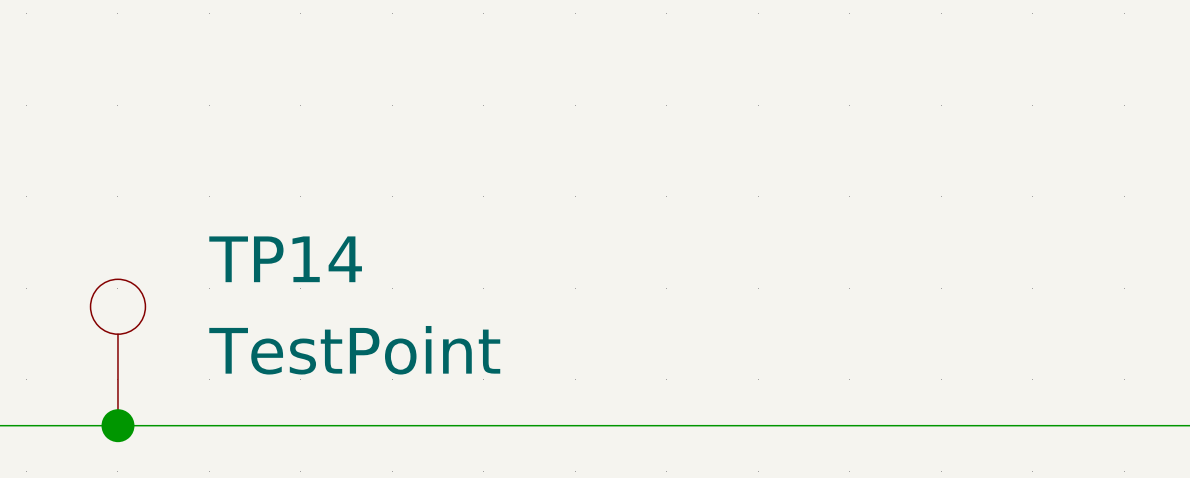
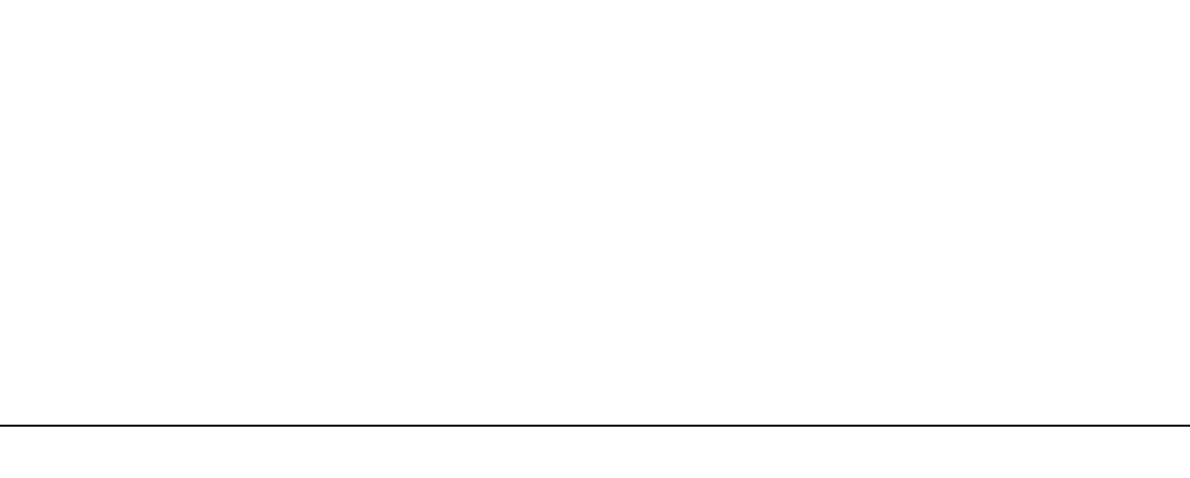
TP14: TestPoint (117, 352) -> none
junction: (117, 425) -> none

